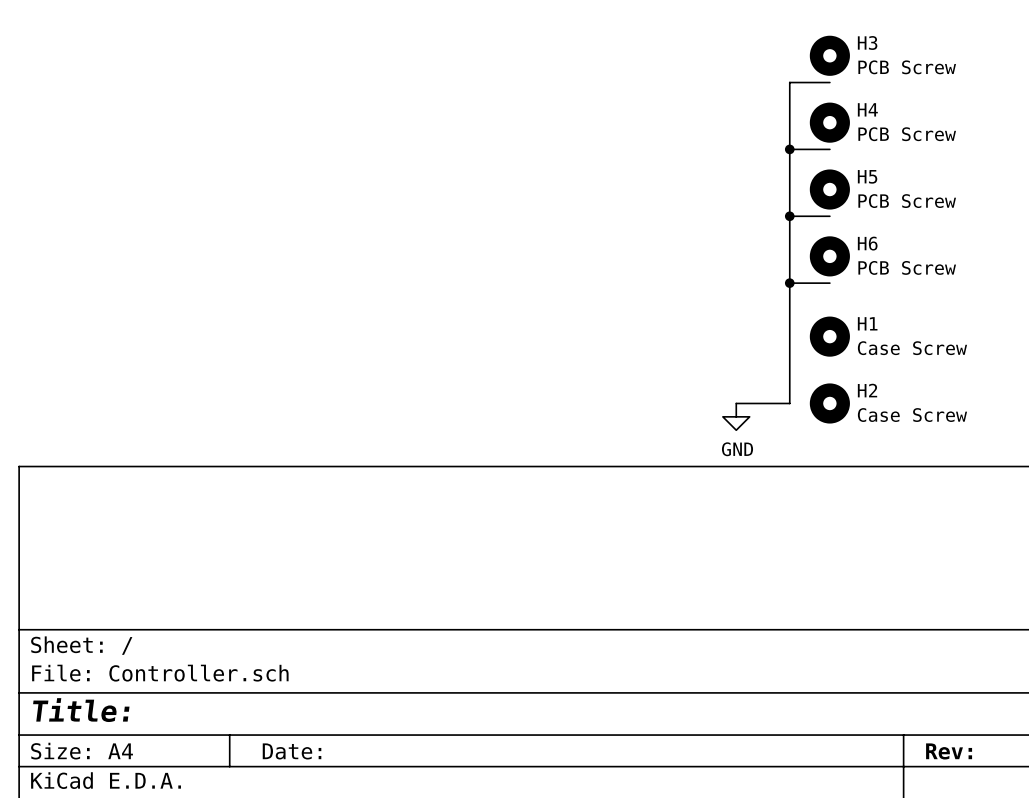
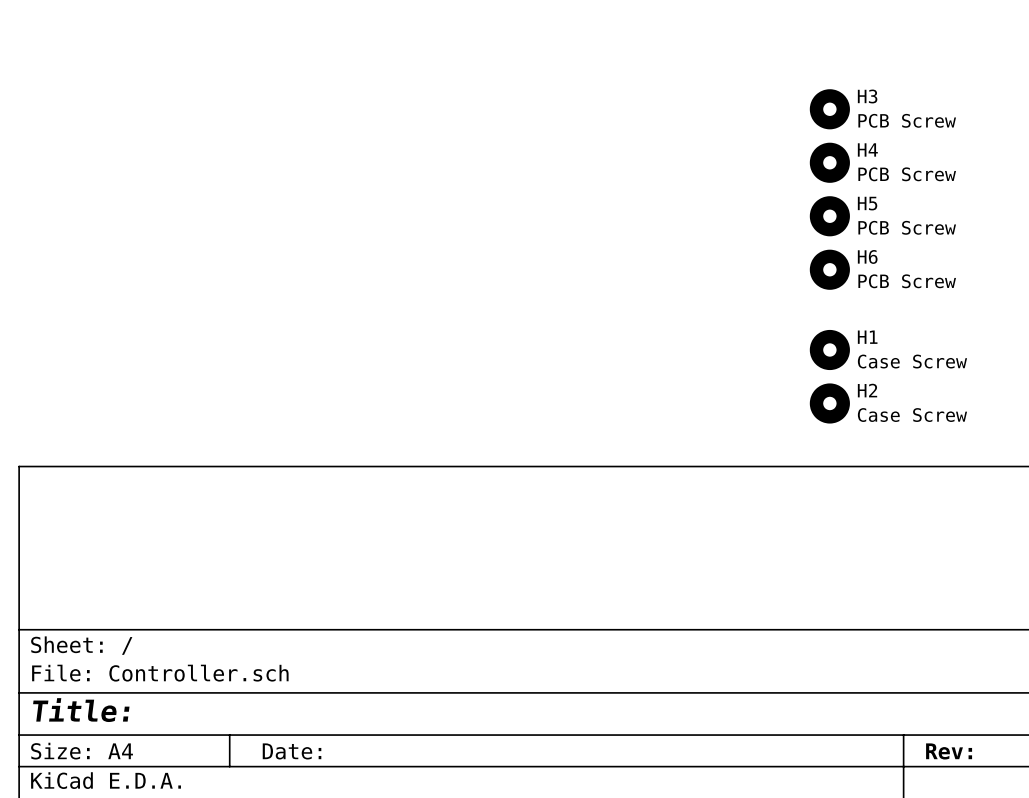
H3 position: (829, 55) -> (829, 109)
wire: (829, 82) (789, 82) (789, 403) (736, 403) -> none
H4 position: (829, 122) -> (829, 162)
wire: (789, 149) (829, 149) -> none
junction: (789, 149) -> none
H5 position: (829, 189) -> (829, 216)
wire: (789, 216) (829, 216) -> none
junction: (789, 216) -> none
H6 position: (829, 256) -> (829, 269)
wire: (789, 283) (829, 283) -> none
junction: (789, 283) -> none
H1 position: (829, 336) -> (829, 349)
power symbol: GND (736, 416) -> none

